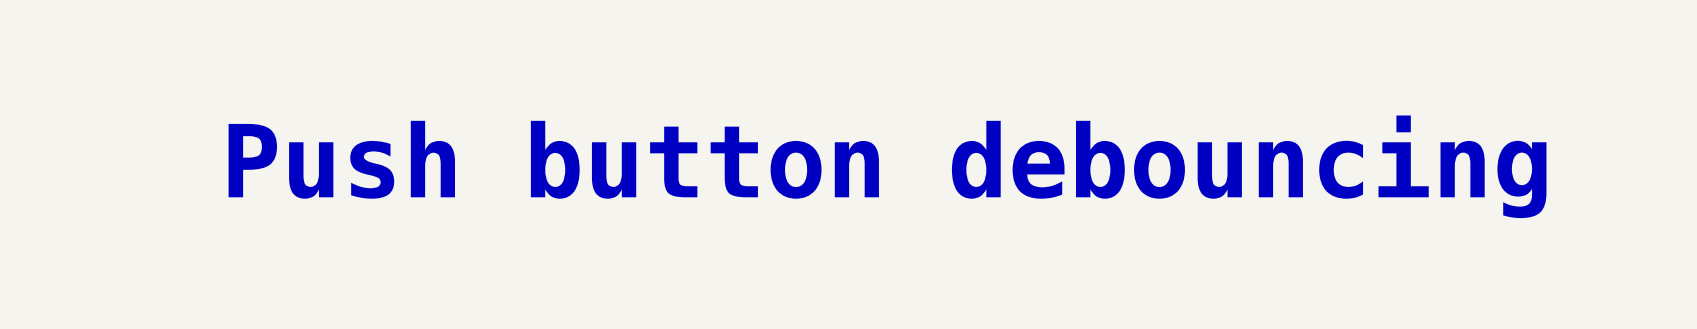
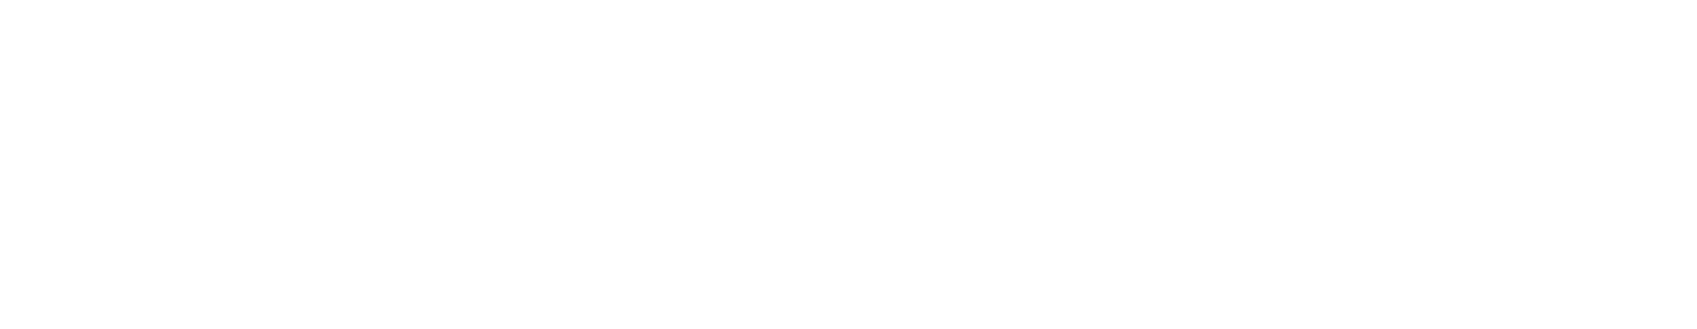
text: Push button debouncing (887, 166) -> none

